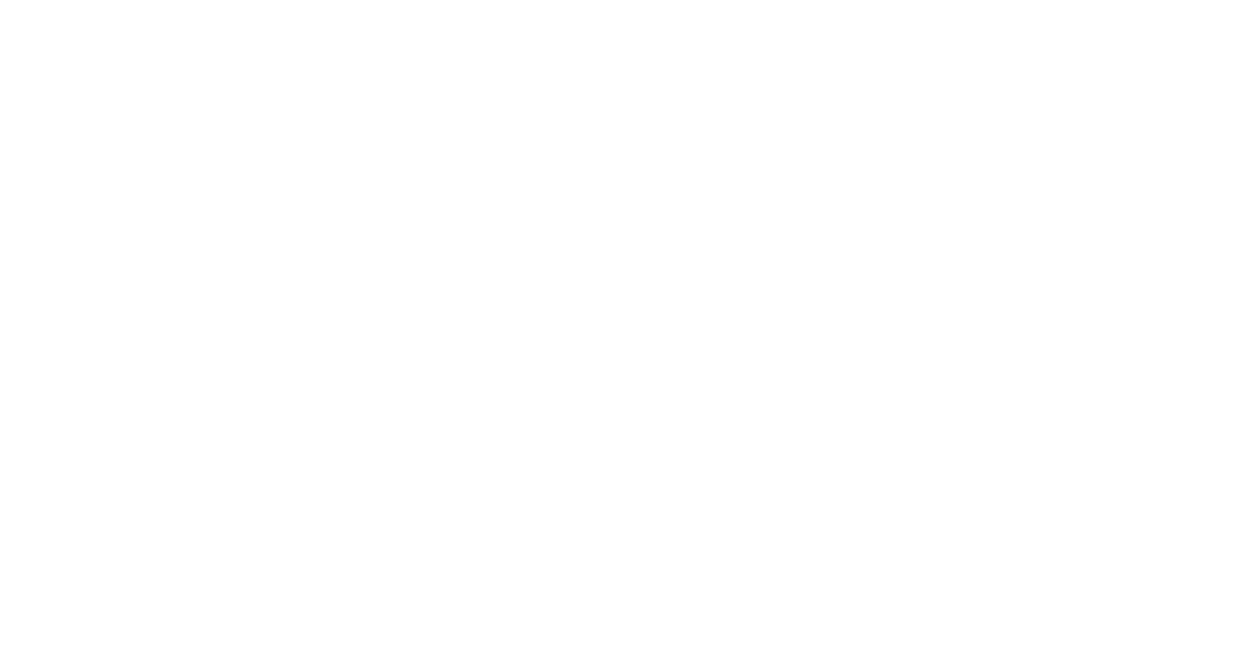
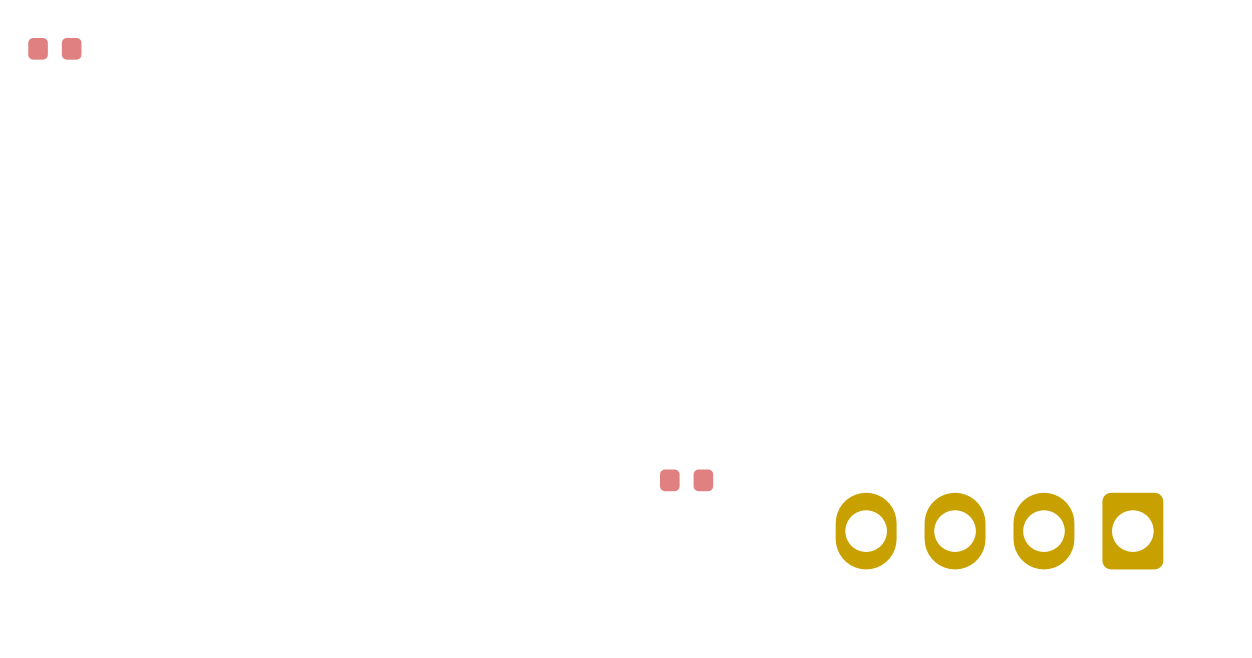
part: none -> (54, 48)
part: none -> (686, 480)
part: none -> (999, 531)

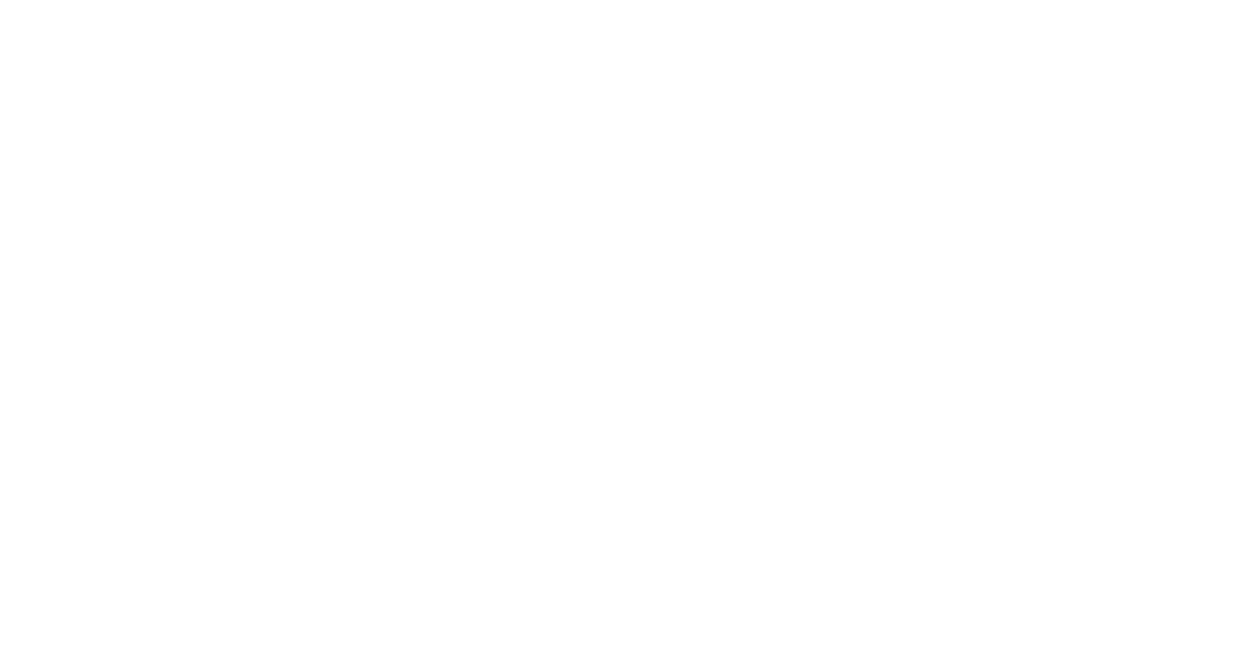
part: (54, 48) -> none
part: (686, 480) -> none
part: (999, 531) -> none

